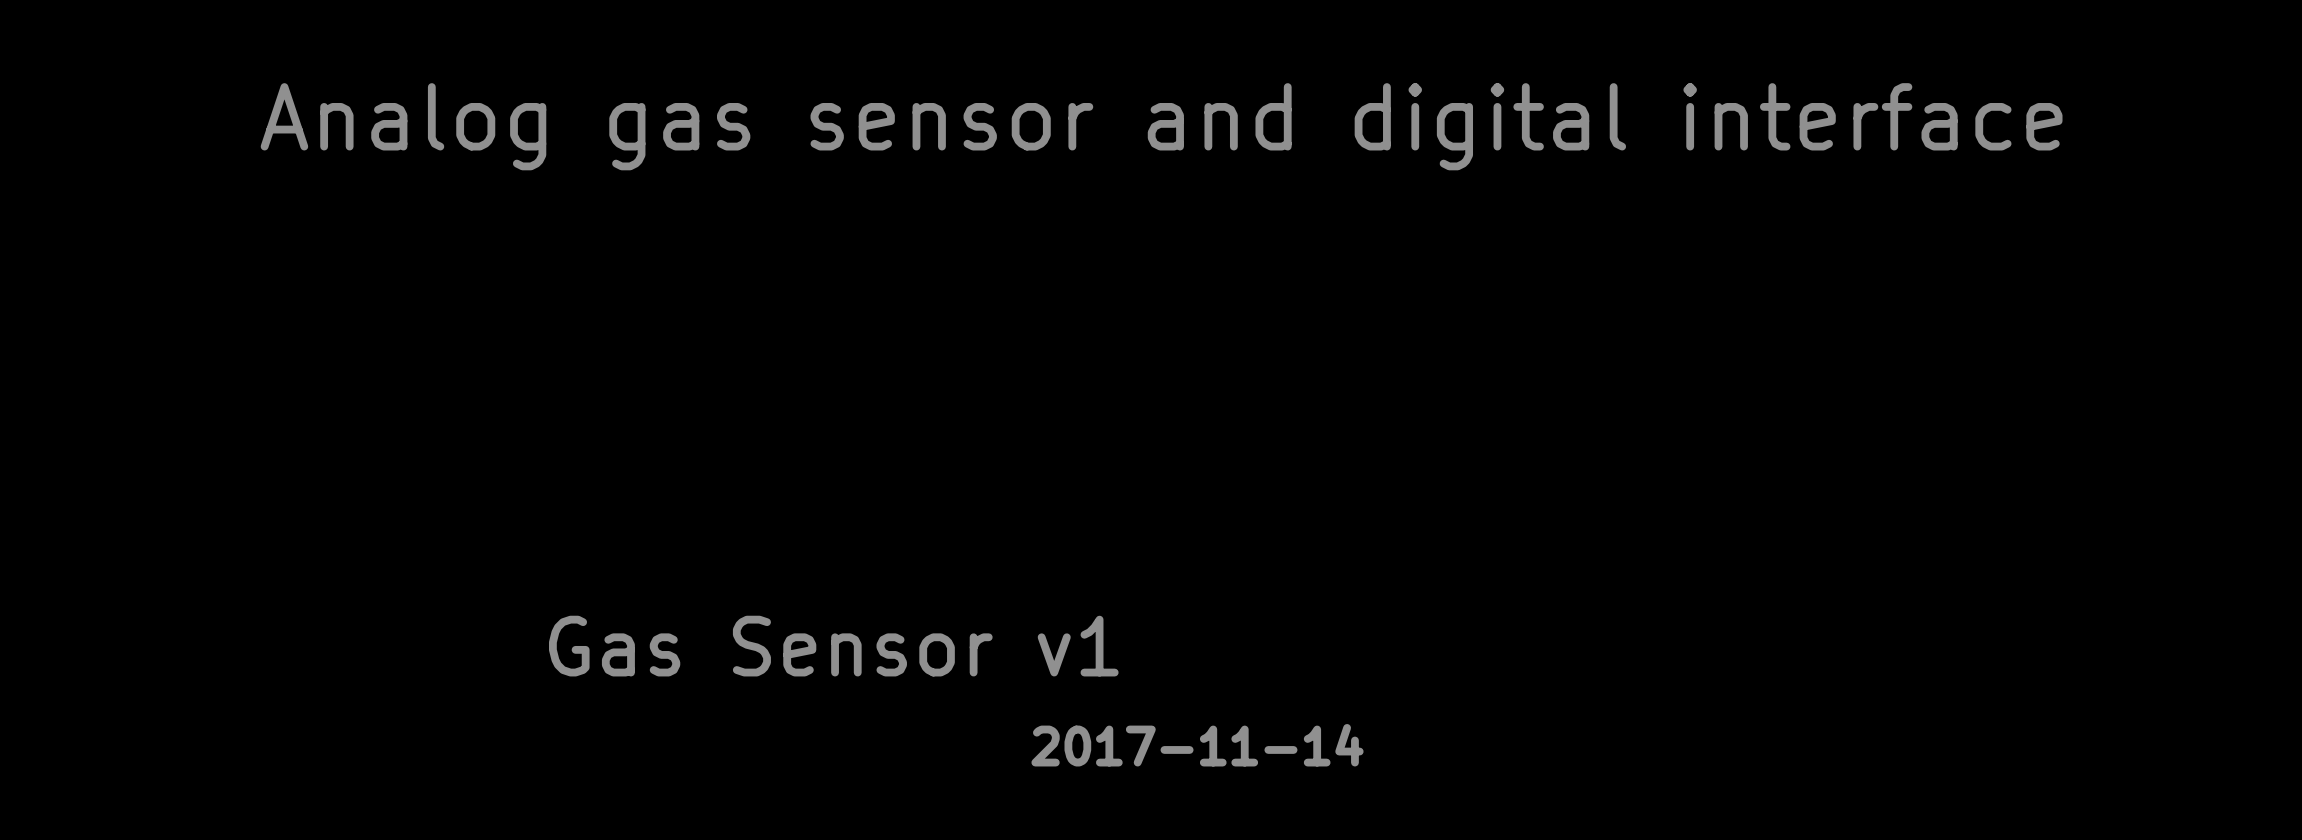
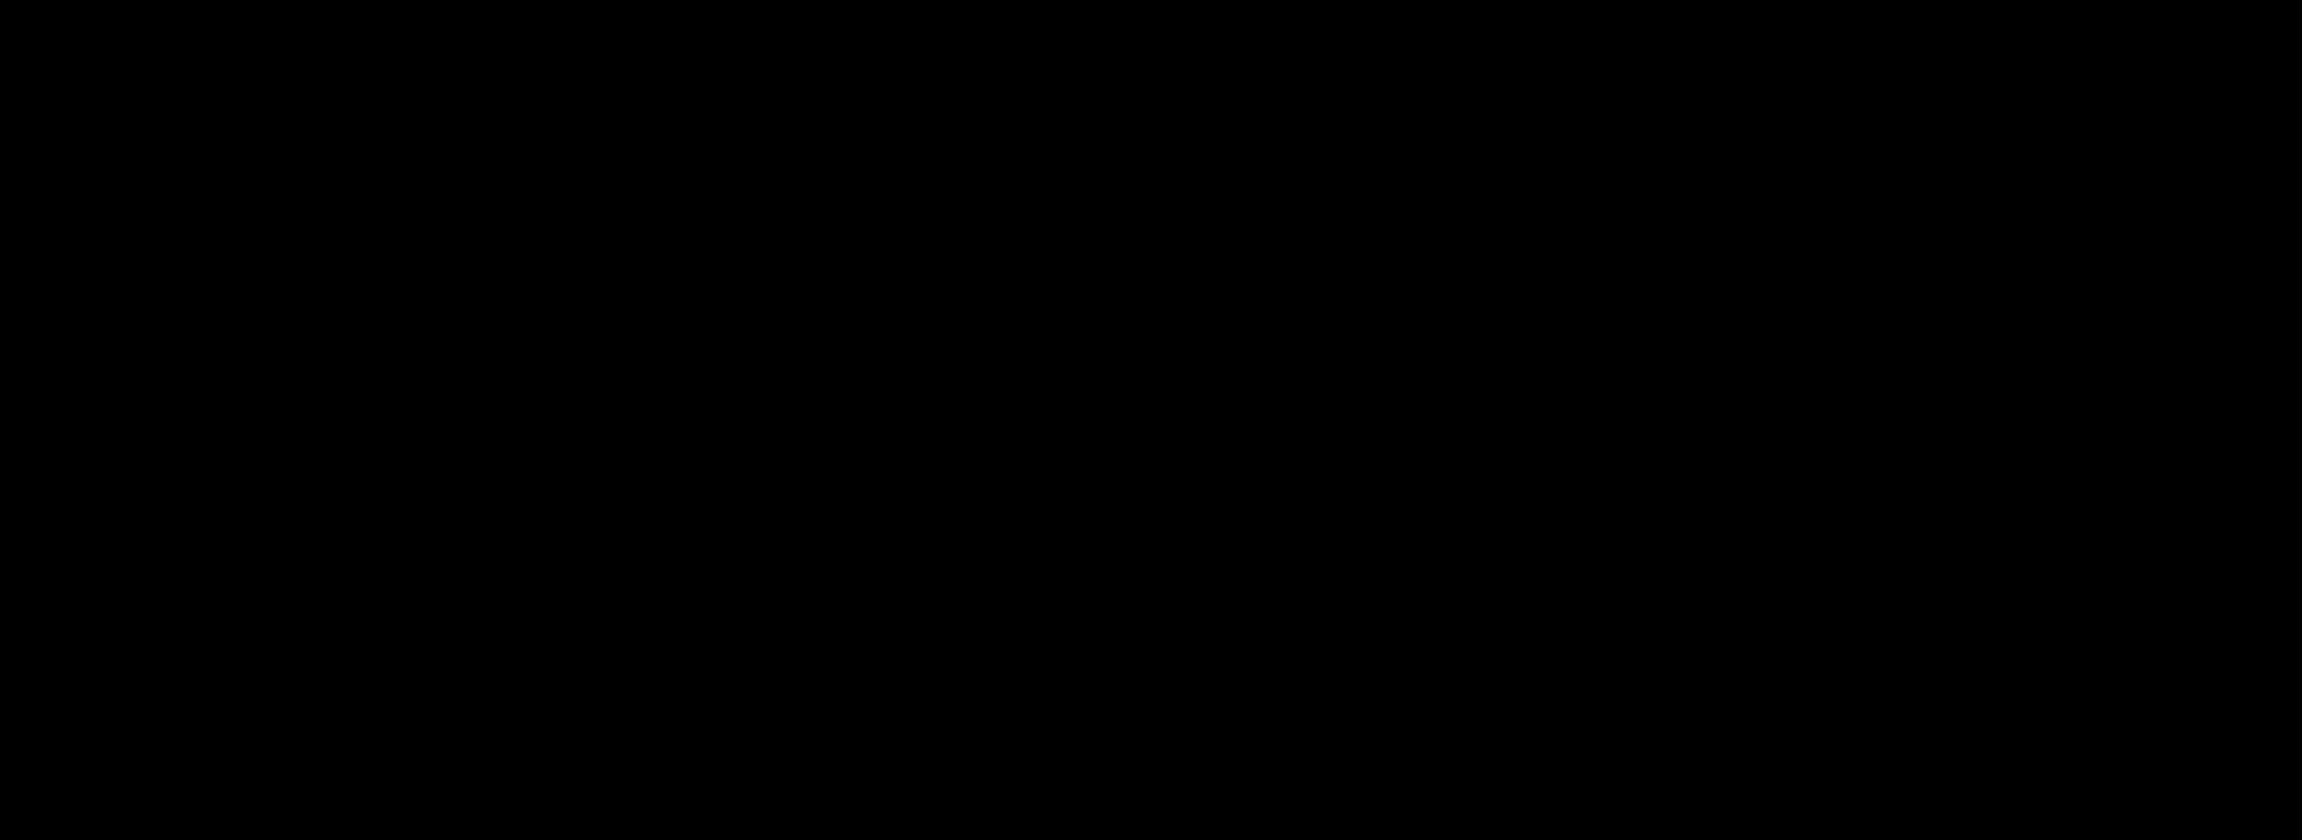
text: Analog gas sensor and digital interface (1161, 126) -> none
text: Gas Sensor v1 (833, 646) -> none
text: 2017-11-14 (1197, 745) -> none

